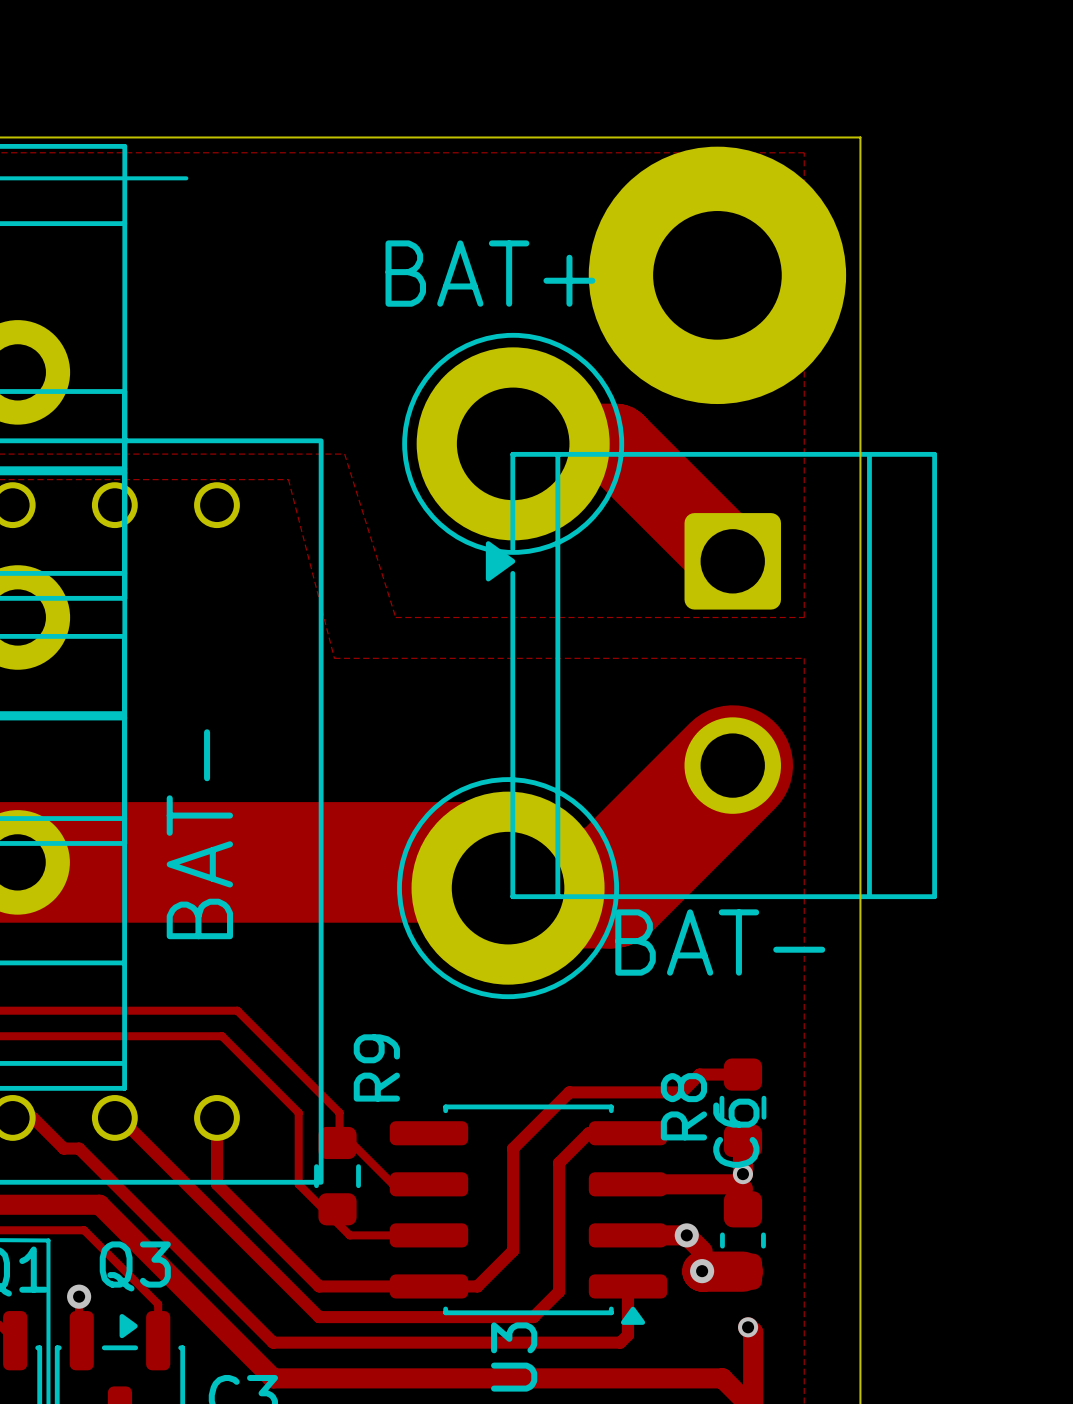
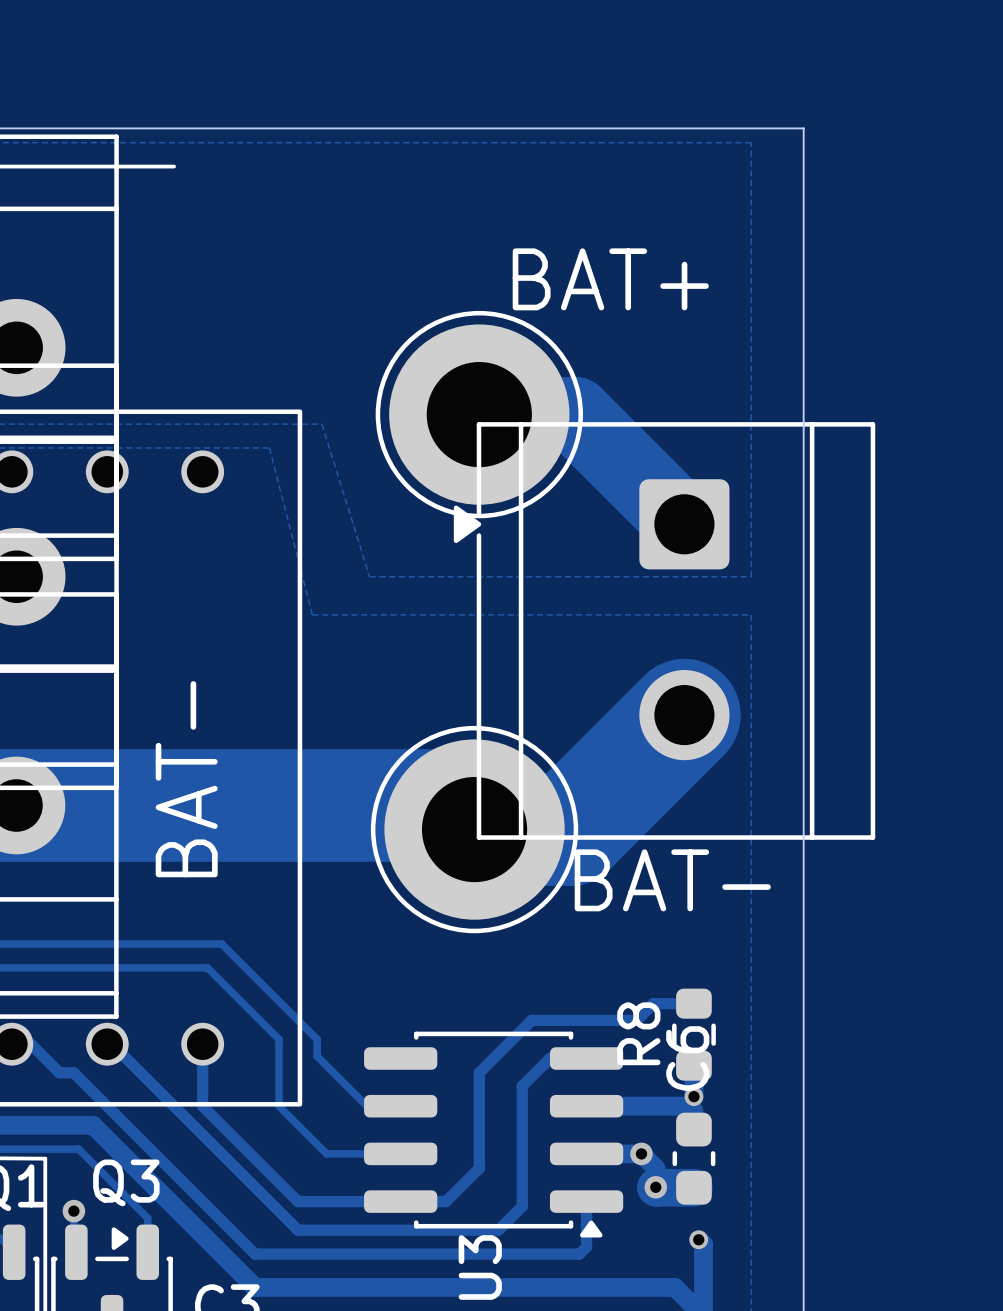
text position: BAT+ (490, 273) -> BAT+ (610, 279)
part: (717, 275) -> none
R9: (337, 1176) -> none

